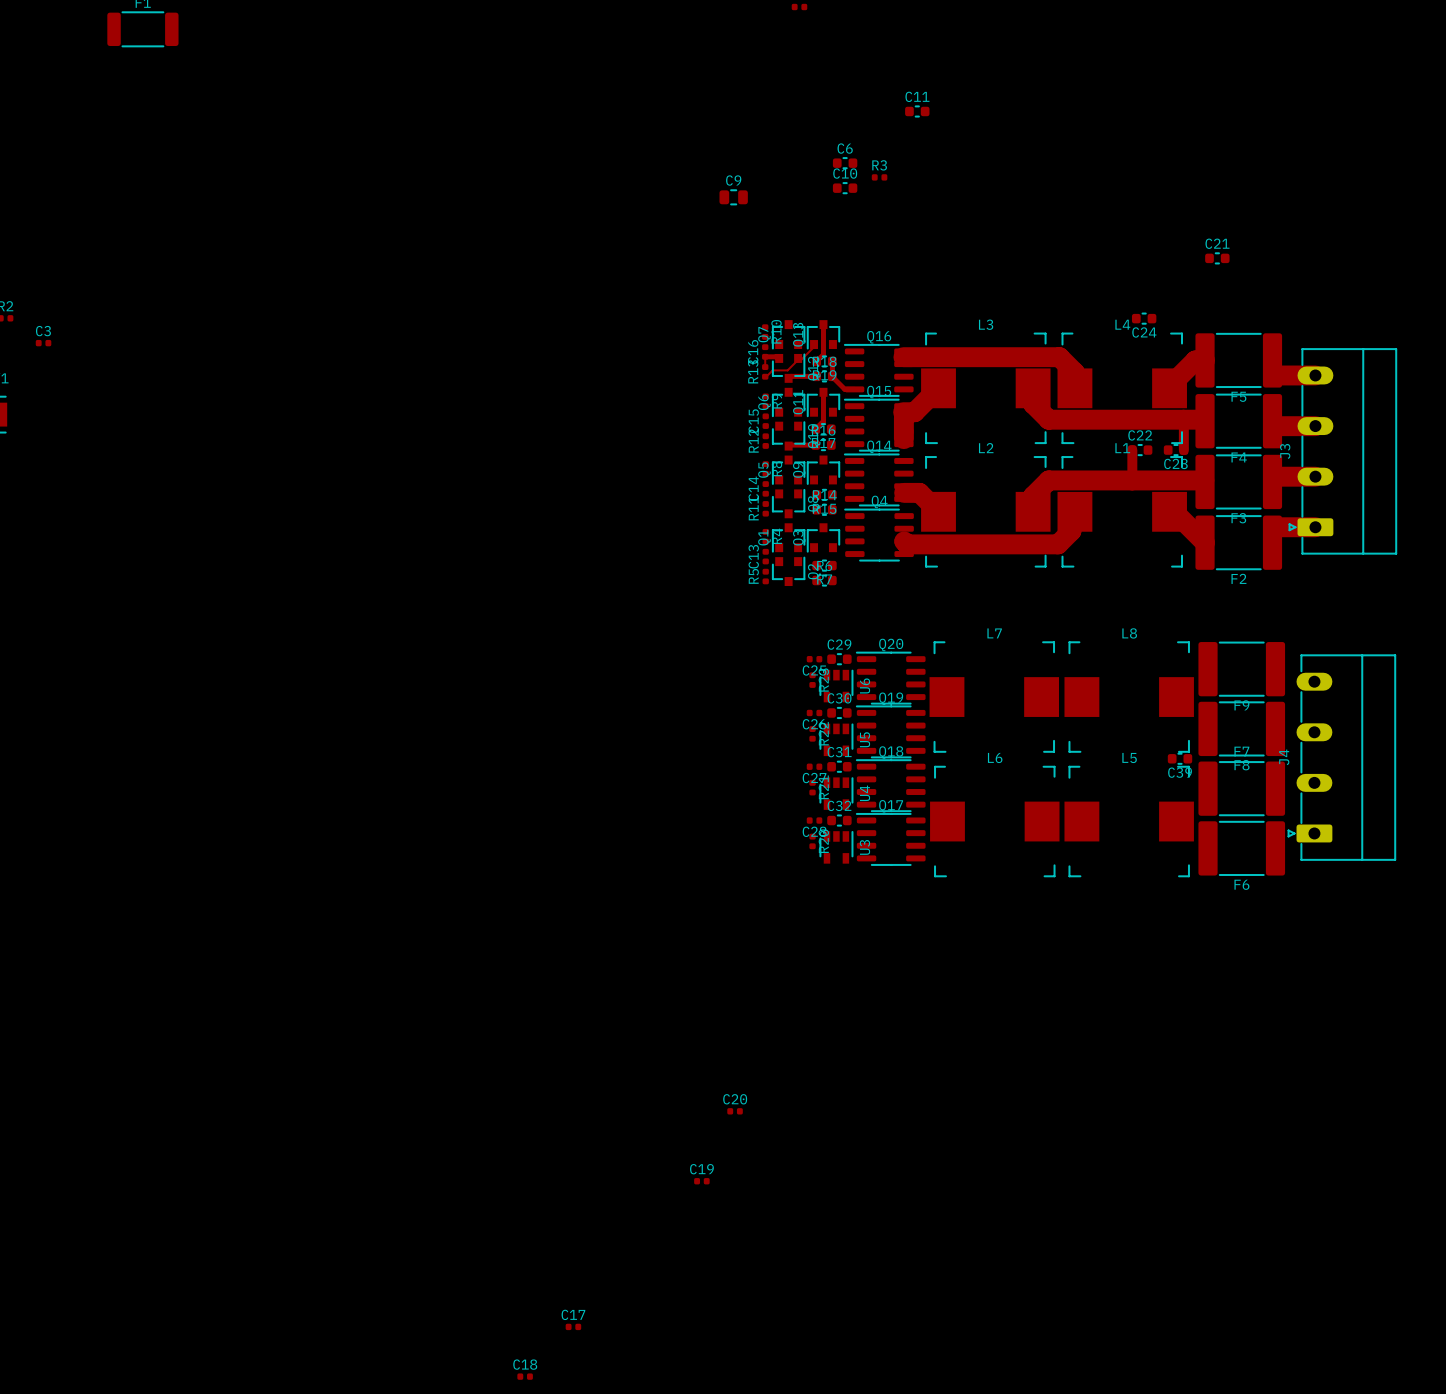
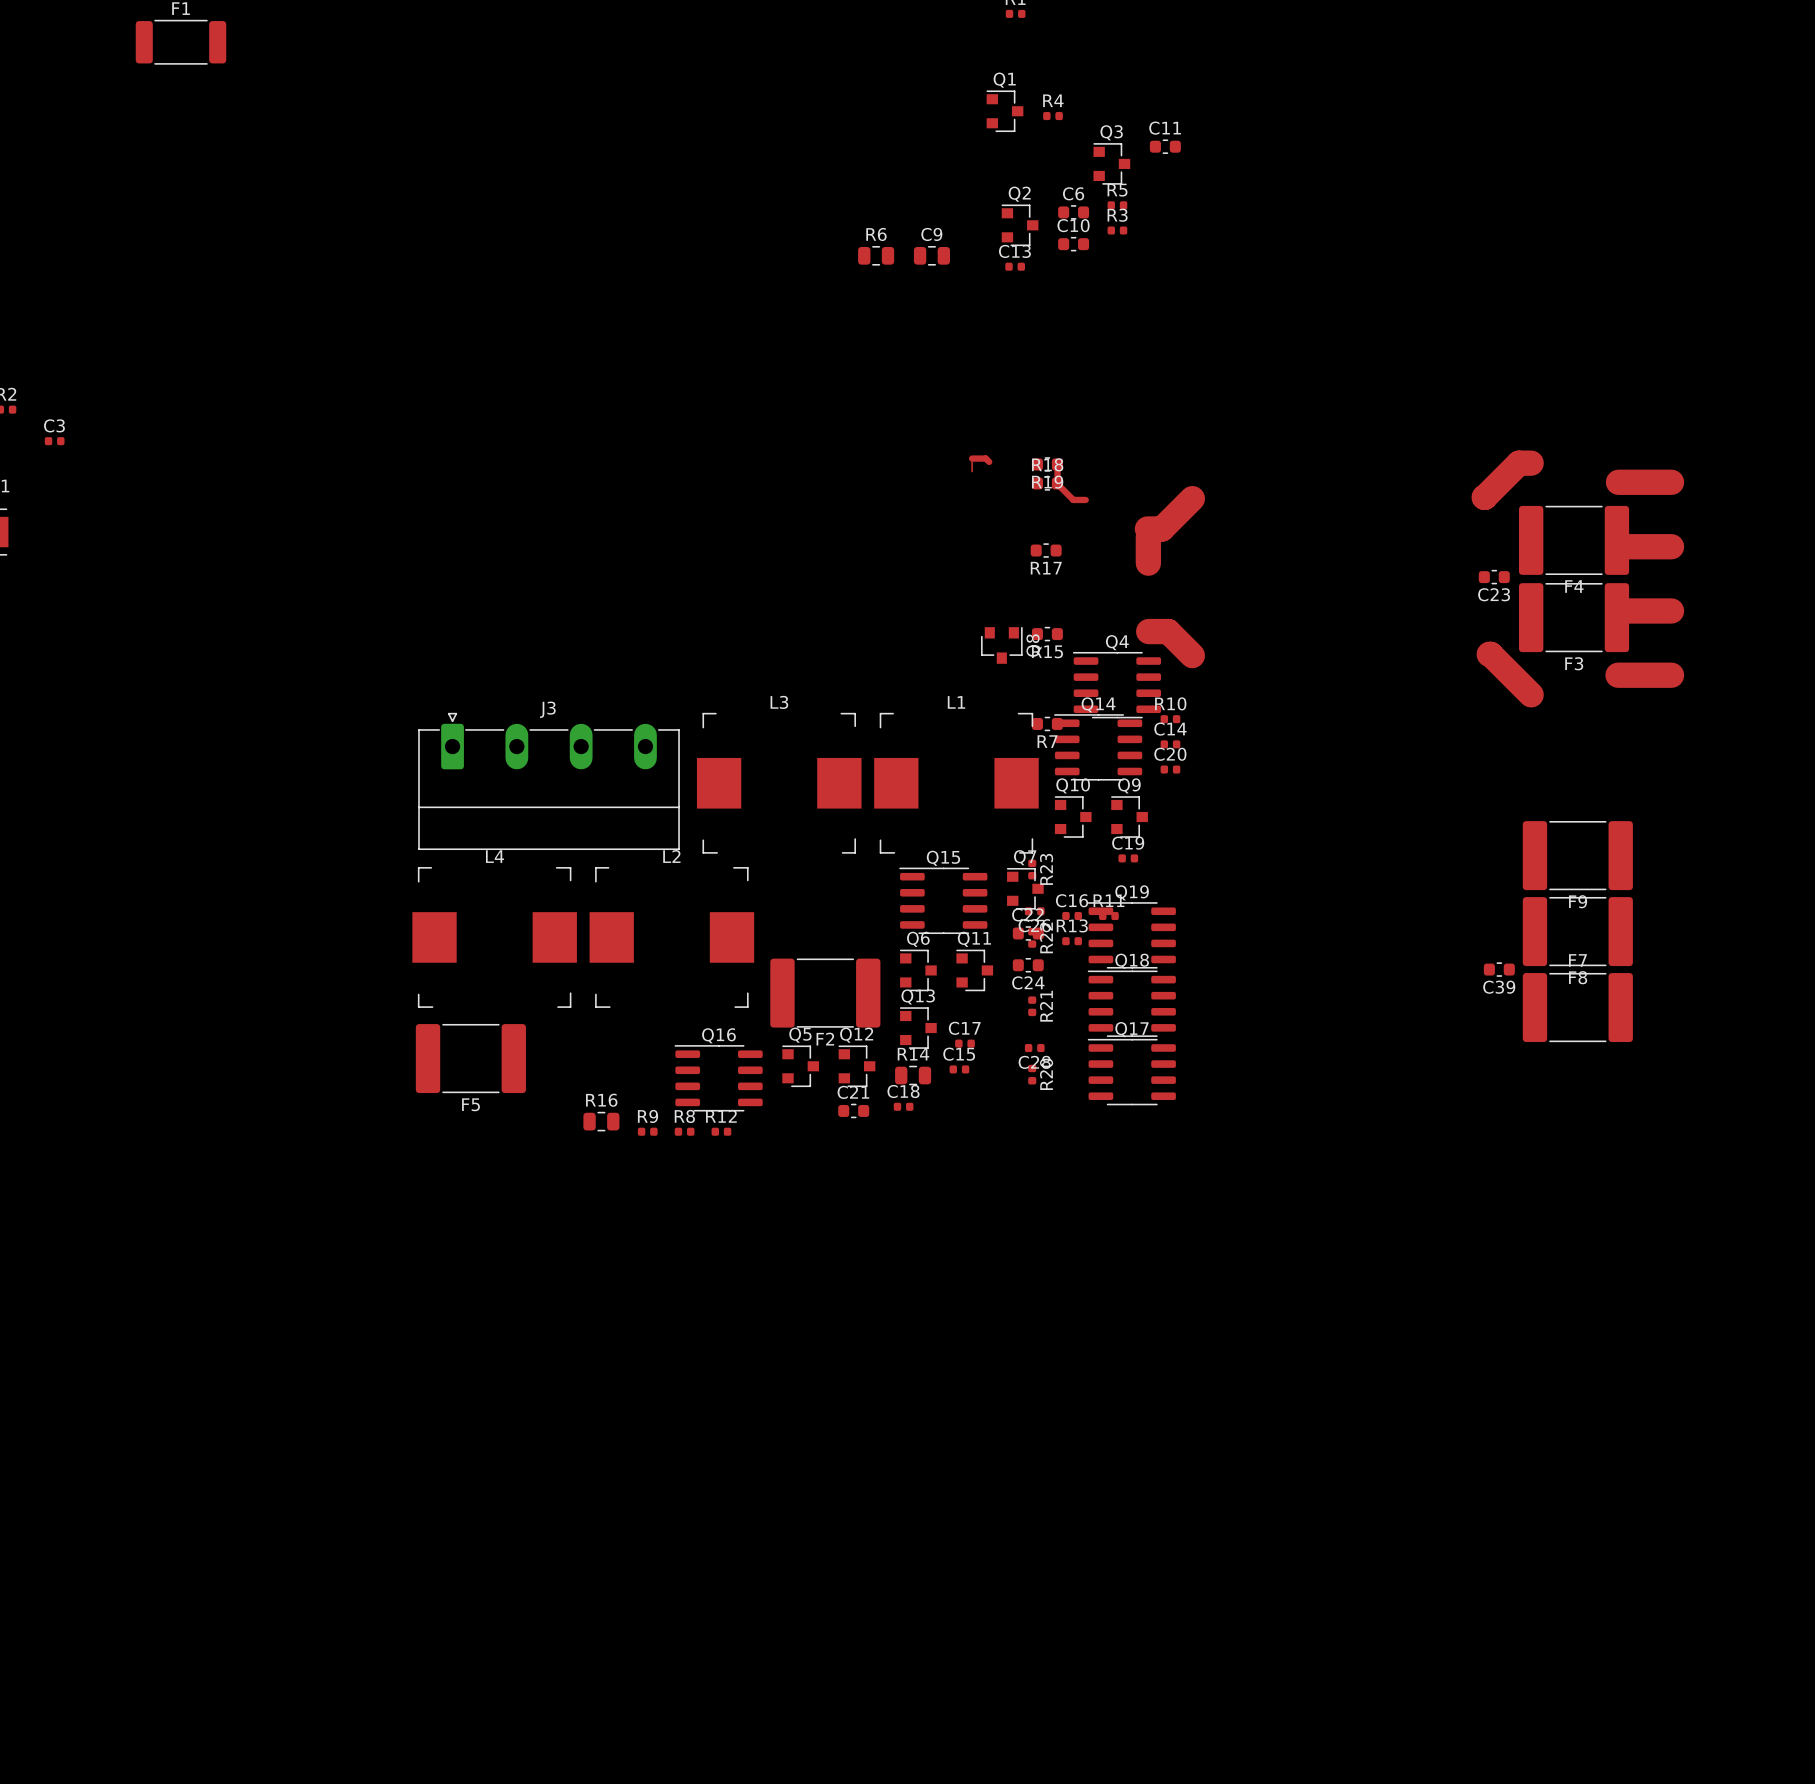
C21 position: (1217, 258) -> (853, 1110)
C24 position: (1144, 318) -> (1028, 965)
top track: (823, 324) (823, 354) (816, 361) -> none
R10 rotation: 0° (765, 332) -> 90° clockwise (1170, 719)
R10 position: (765, 332) -> (1170, 719)
Q7 rotation: 0° (788, 334) -> 90° clockwise (1025, 888)
Q7 position: (788, 334) -> (1025, 888)
Q13 rotation: 0° (823, 334) -> 90° clockwise (918, 1028)
Q13 position: (823, 334) -> (918, 1028)
top track: (816, 344) (801, 359) (797, 359) -> none
C16 rotation: 0° (765, 351) -> 90° clockwise (1072, 916)
C16 position: (765, 351) -> (1072, 916)
top track: (903, 357) (1059, 357) (1074, 372) (1074, 388) -> none
top track: (798, 359) (787, 370) (772, 370) (765, 377) -> none
F5 position: (1238, 360) -> (470, 1058)
Q12 rotation: 0° (788, 368) -> 90° counterclockwise (856, 1066)
Q12 position: (788, 368) -> (856, 1066)
Q16 position: (878, 370) -> (718, 1078)
R13 rotation: 0° (765, 371) -> 90° clockwise (1072, 941)
R13 position: (765, 371) -> (1072, 941)
top track: (816, 376) (790, 376) (788, 378) -> none
L3 position: (985, 388) -> (779, 783)
top track: (1033, 388) (1033, 404) (1048, 419) (1203, 419) -> none
L4 position: (1122, 388) -> (494, 937)
top track: (823, 392) (823, 421) (815, 429) -> none
R9 rotation: 0° (765, 401) -> 90° clockwise (647, 1131)
R9 position: (765, 401) -> (647, 1131)
Q6 rotation: 0° (788, 402) -> 90° clockwise (918, 970)
Q6 position: (788, 402) -> (918, 970)
Q11 rotation: 0° (823, 402) -> 90° clockwise (974, 970)
Q11 position: (823, 402) -> (974, 970)
top track: (1183, 419) (1183, 450) -> none
C15 rotation: 0° (765, 421) -> 90° clockwise (959, 1069)
C15 position: (765, 421) -> (959, 1069)
Q15 position: (878, 425) -> (943, 900)
Q10 rotation: 0° (788, 436) -> 90° counterclockwise (1073, 817)
Q10 position: (788, 436) -> (1073, 817)
R16 footprint: [811, 439, 836, 451] -> [583, 1111, 620, 1132]
R12 rotation: 0° (765, 441) -> 90° clockwise (721, 1131)
R12 position: (765, 441) -> (721, 1131)
top track: (815, 445) (788, 446) -> none
top track: (1132, 450) (1132, 480) -> none
C22 position: (1140, 450) -> (1028, 933)
J3 rotation: 0° (1342, 451) -> 90° clockwise (549, 781)
J3 position: (1342, 451) -> (549, 781)
R8 rotation: 0° (765, 468) -> 90° clockwise (684, 1131)
R8 position: (765, 468) -> (684, 1131)
Q5 rotation: 0° (788, 470) -> 90° clockwise (800, 1066)
Q5 position: (788, 470) -> (800, 1066)
Q9 rotation: 0° (823, 470) -> 90° clockwise (1129, 817)
Q9 position: (823, 470) -> (1129, 817)
Q14 position: (878, 479) -> (1098, 747)
top track: (1204, 480) (1048, 480) (1033, 496) (1033, 511) -> none
C14 rotation: 0° (765, 488) -> 90° clockwise (1170, 744)
C14 position: (765, 488) -> (1170, 744)
R14 footprint: [812, 504, 837, 516] -> [895, 1065, 932, 1086]
R11 rotation: 0° (765, 508) -> 90° clockwise (1108, 916)
R11 position: (765, 508) -> (1108, 916)
top track: (1071, 510) (1071, 531) (1058, 544) (907, 544) (904, 541) -> none
L2 position: (985, 511) -> (671, 937)
L1 position: (1122, 511) -> (956, 783)
R4 rotation: 0° (765, 536) -> 90° clockwise (1052, 116)
R4 position: (765, 536) -> (1052, 116)
Q1 rotation: 0° (788, 537) -> 90° clockwise (1004, 111)
Q1 position: (788, 537) -> (1004, 111)
Q3 rotation: 0° (823, 537) -> 90° clockwise (1111, 163)
Q3 position: (823, 537) -> (1111, 163)
F2 position: (1238, 542) -> (825, 993)
C13 rotation: 0° (765, 556) -> 90° clockwise (1015, 266)
C13 position: (765, 556) -> (1015, 266)
Q2 rotation: 0° (788, 571) -> 90° counterclockwise (1020, 225)
Q2 position: (788, 571) -> (1020, 225)
R6 footprint: [812, 574, 837, 587] -> [858, 246, 895, 266]
R5 rotation: 0° (765, 576) -> 90° clockwise (1117, 205)
R5 position: (765, 576) -> (1117, 205)
C25: (814, 659) -> none
C29: (839, 659) -> none
Q20: (890, 678) -> none
U6: (836, 686) -> none
L7: (994, 697) -> none
L8: (1129, 697) -> none
C30: (839, 712) -> none
U5: (836, 739) -> none
J4: (1341, 757) -> none
C27: (814, 766) -> none
C31: (839, 766) -> none
U4: (836, 793) -> none
C32: (839, 820) -> none
L6: (994, 821) -> none
L5: (1129, 821) -> none
U3: (836, 847) -> none
F6: (1241, 848) -> none
C20 position: (735, 1111) -> (1170, 769)
C19 position: (701, 1181) -> (1128, 858)
C17 position: (573, 1326) -> (965, 1043)
C18 position: (525, 1376) -> (903, 1106)

